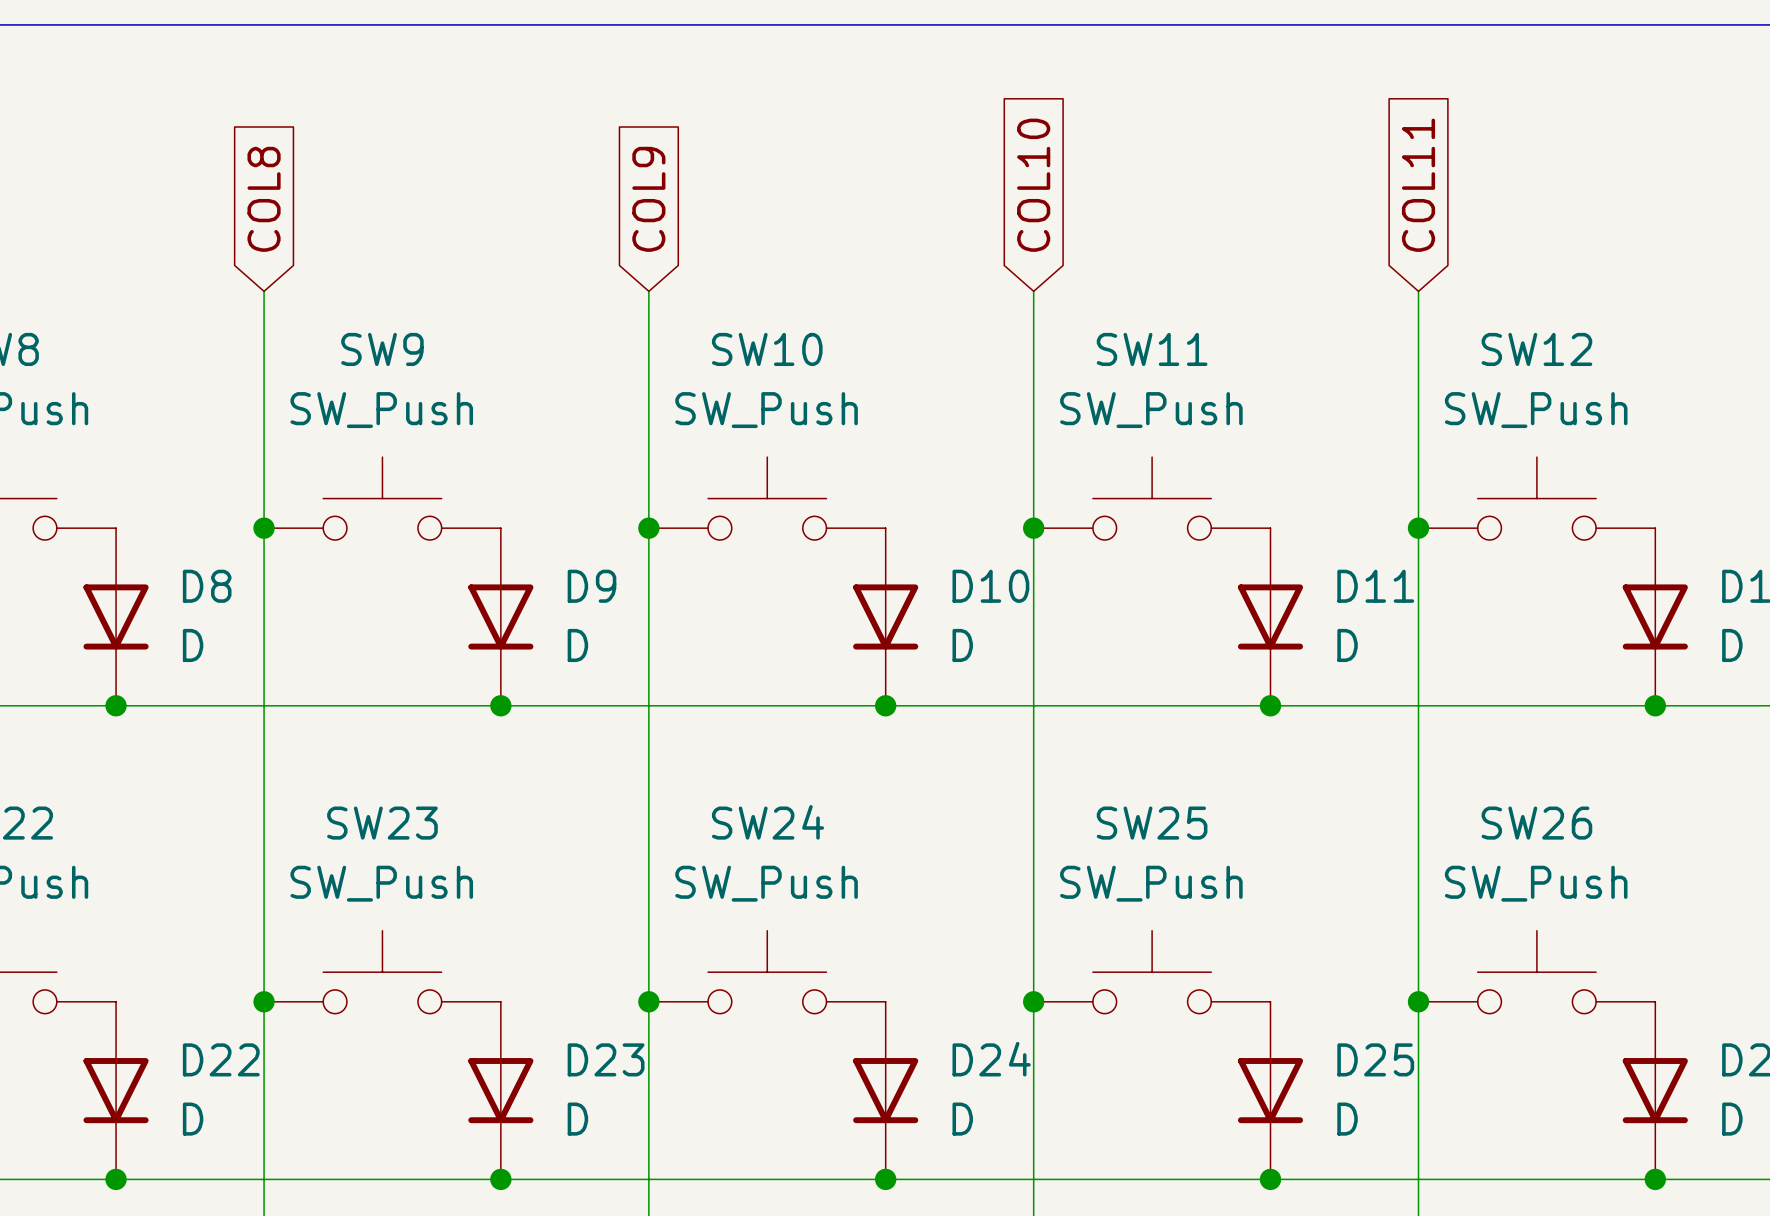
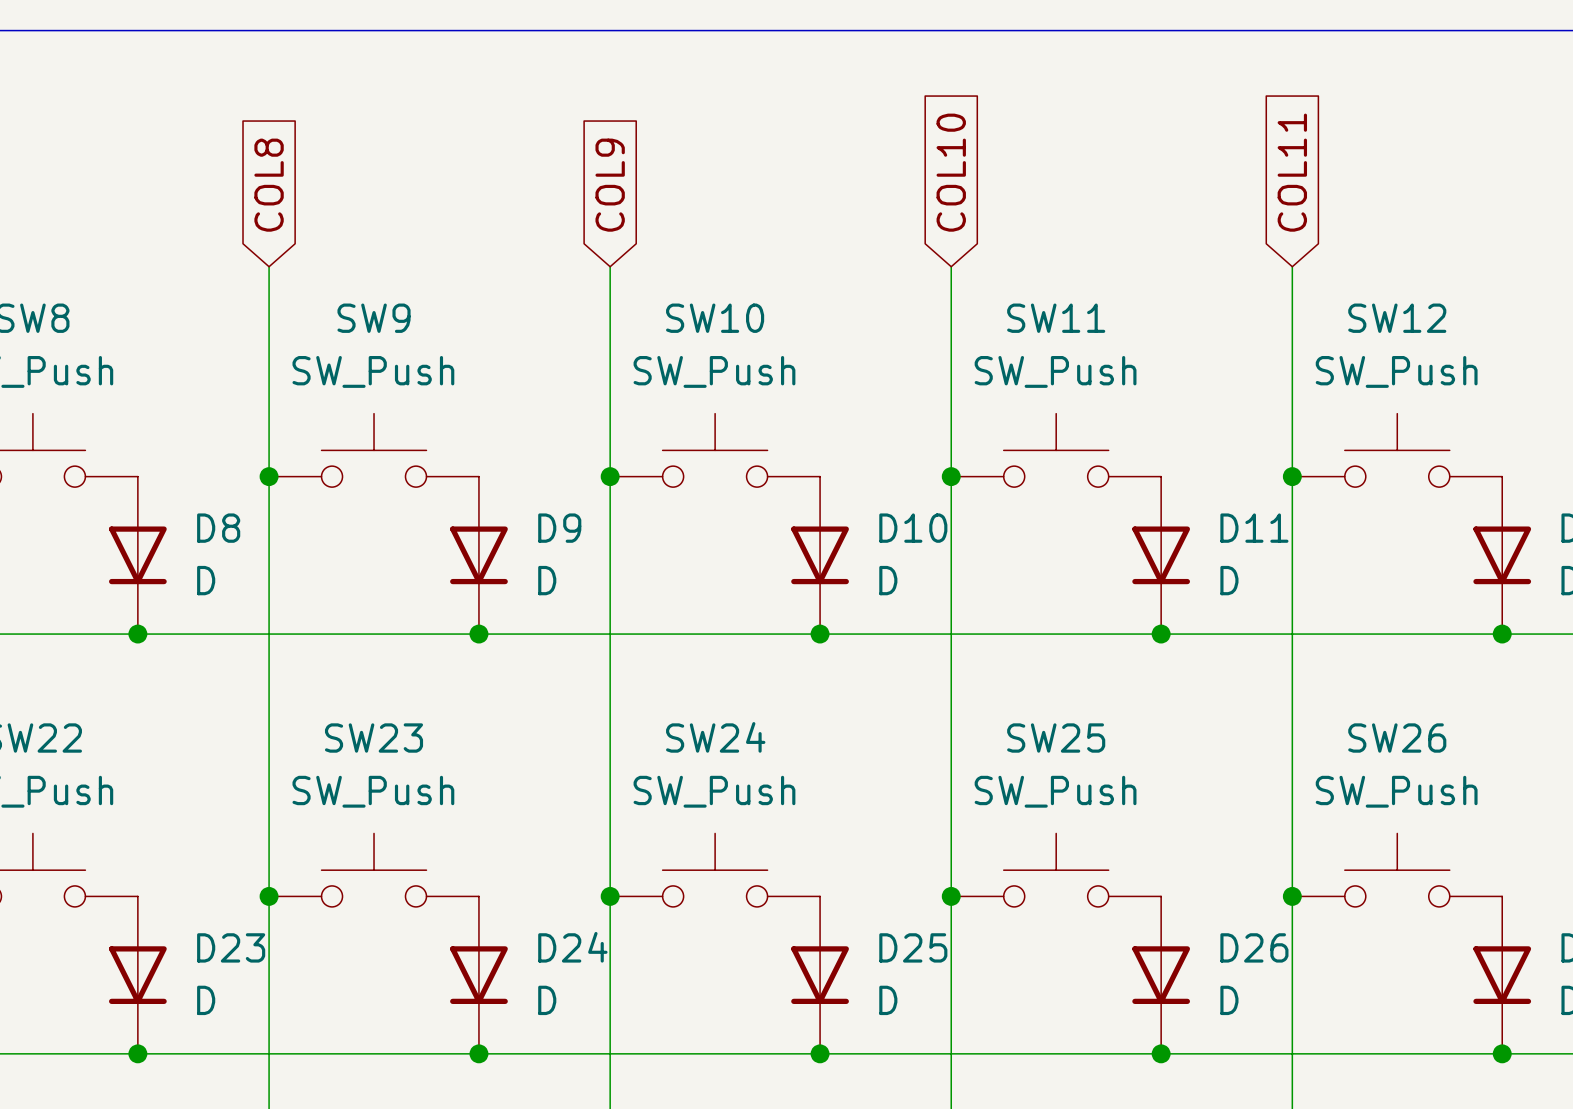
D22 name: D22 (221, 1059) -> D23 (231, 947)
D23 name: D23 (606, 1059) -> D24 (572, 947)
D24 name: D24 (991, 1059) -> D25 (913, 947)
D25 name: D25 (1375, 1059) -> D26 (1254, 947)

